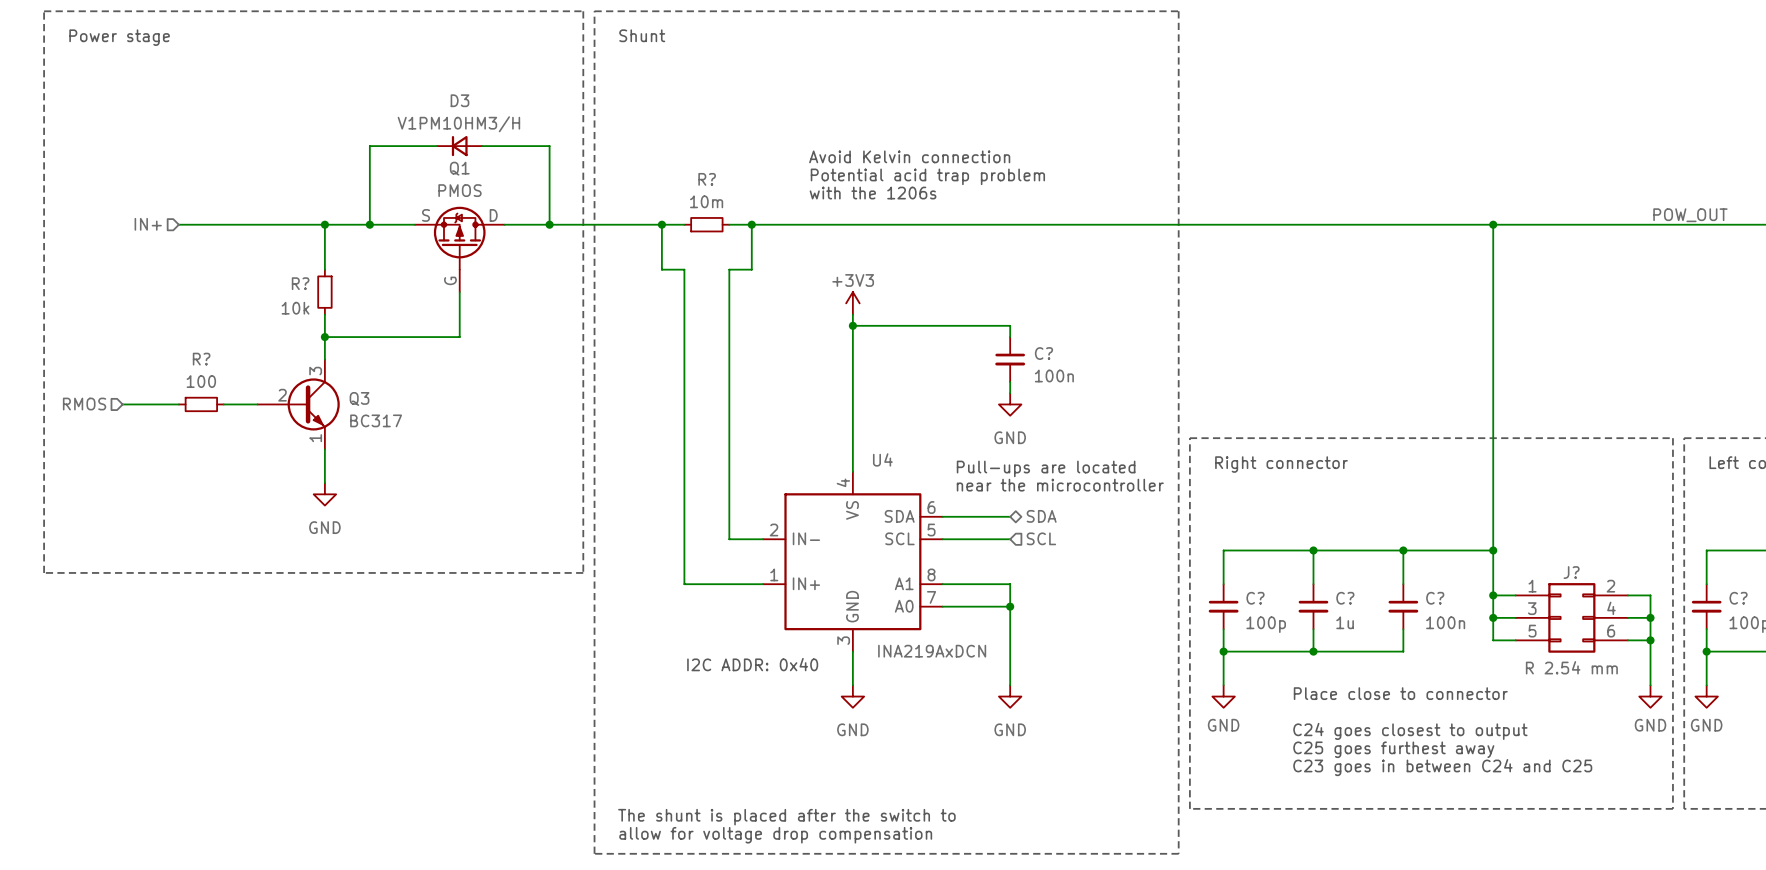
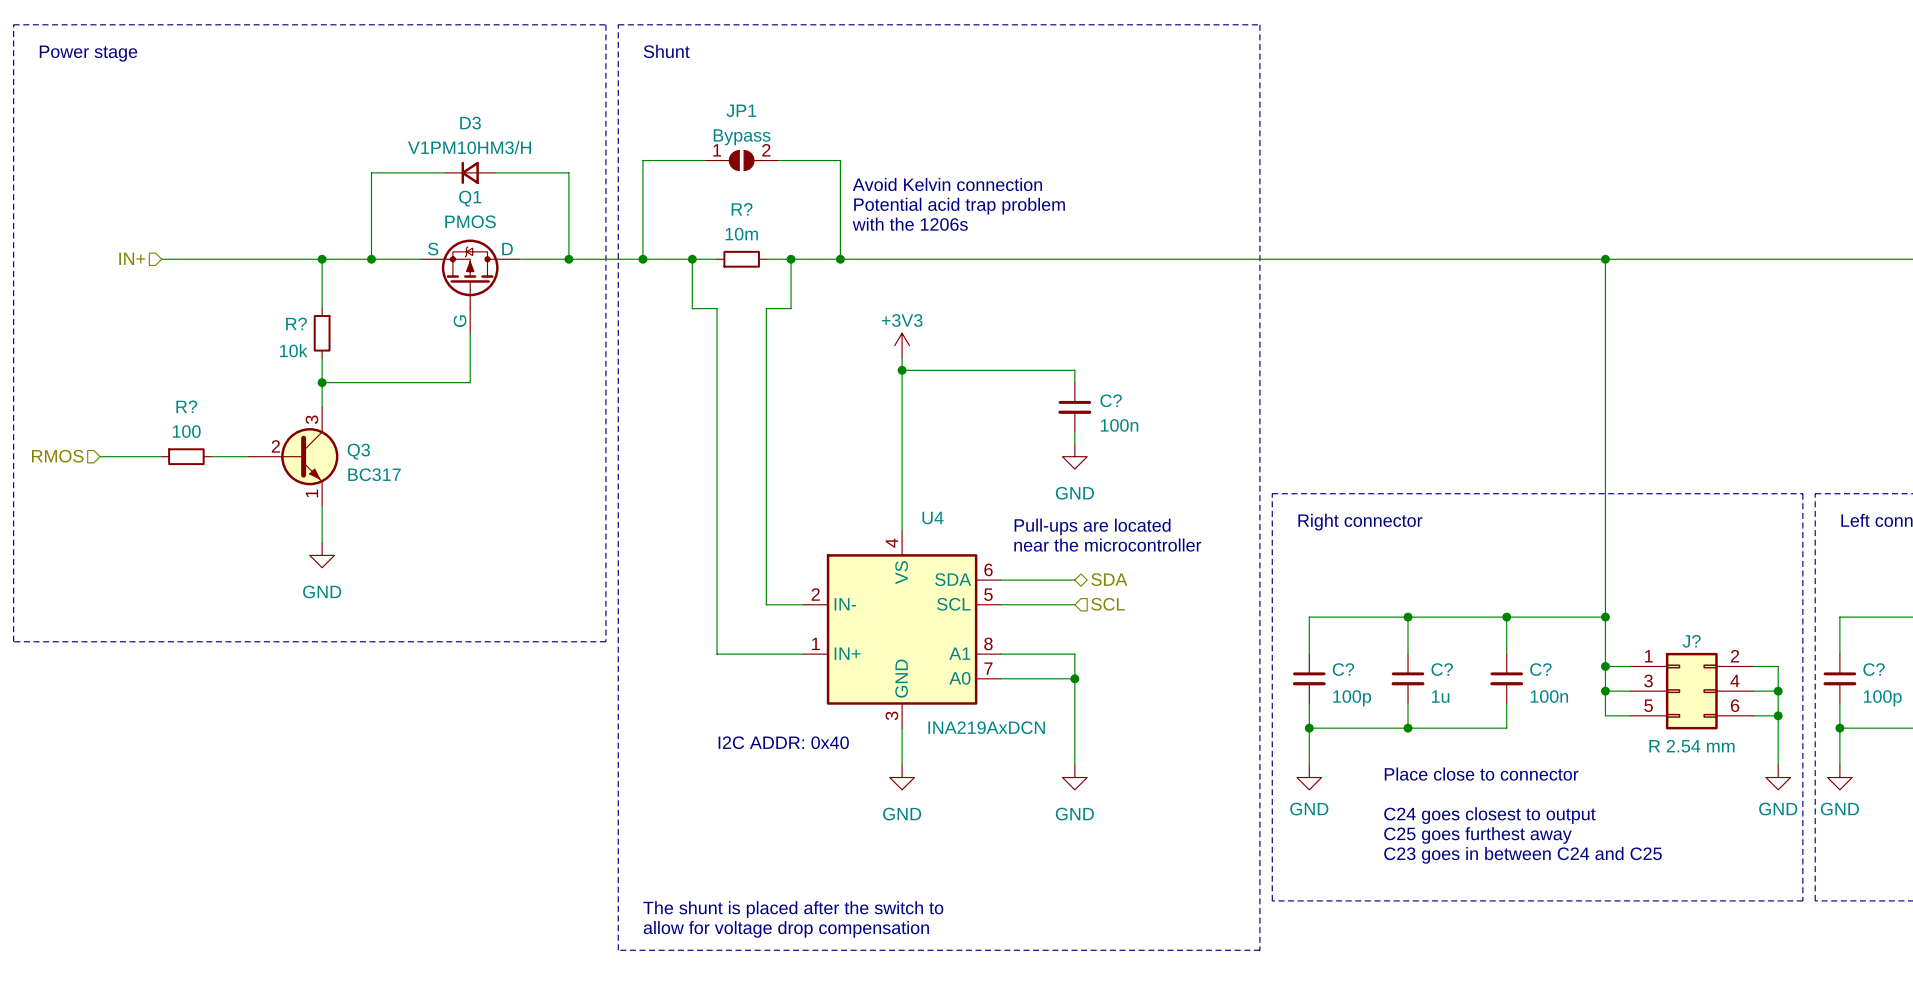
wire: none -> (704, 160) (642, 160) (642, 259)
JP1: none -> Bypass (741, 160)
wire: none -> (778, 160) (840, 160) (840, 259)
label: POW_OUT (1690, 215) -> none
junction: none -> (642, 259)
junction: none -> (840, 259)

